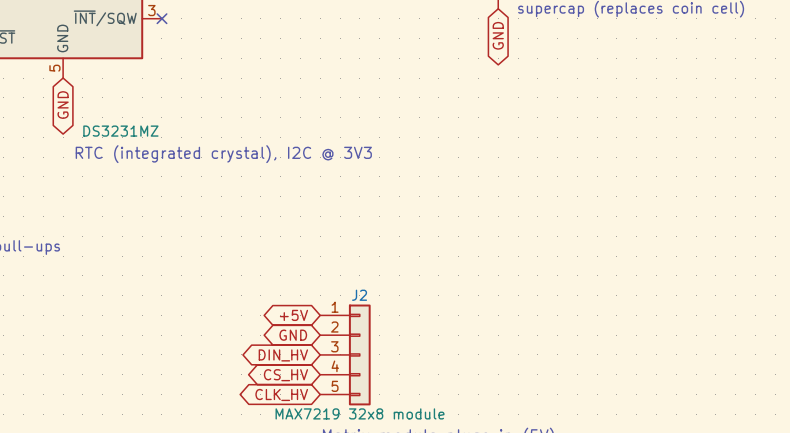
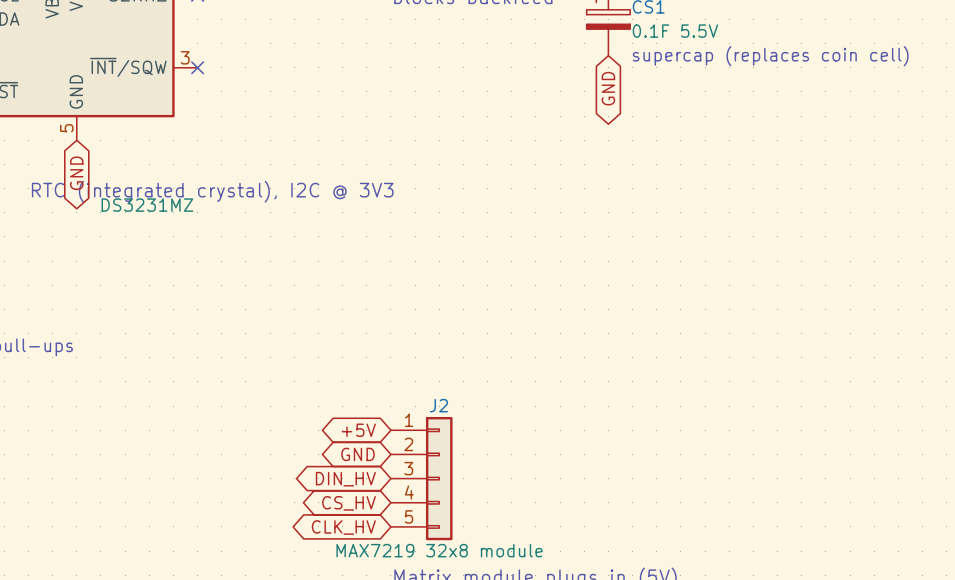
text position: RTC (integrated crystal), I2C @ 3V3 (223, 154) -> RTC (integrated crystal), I2C @ 3V3 (212, 191)

